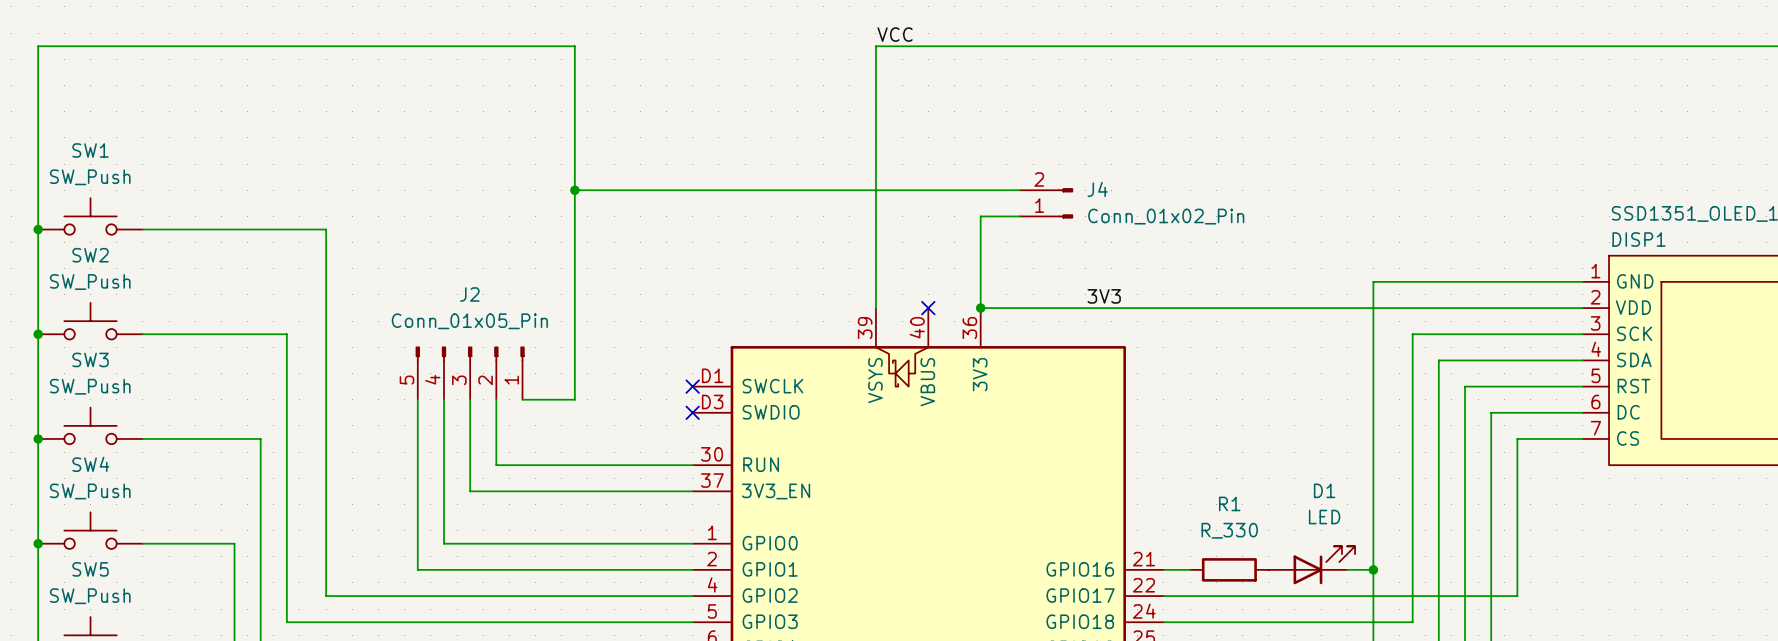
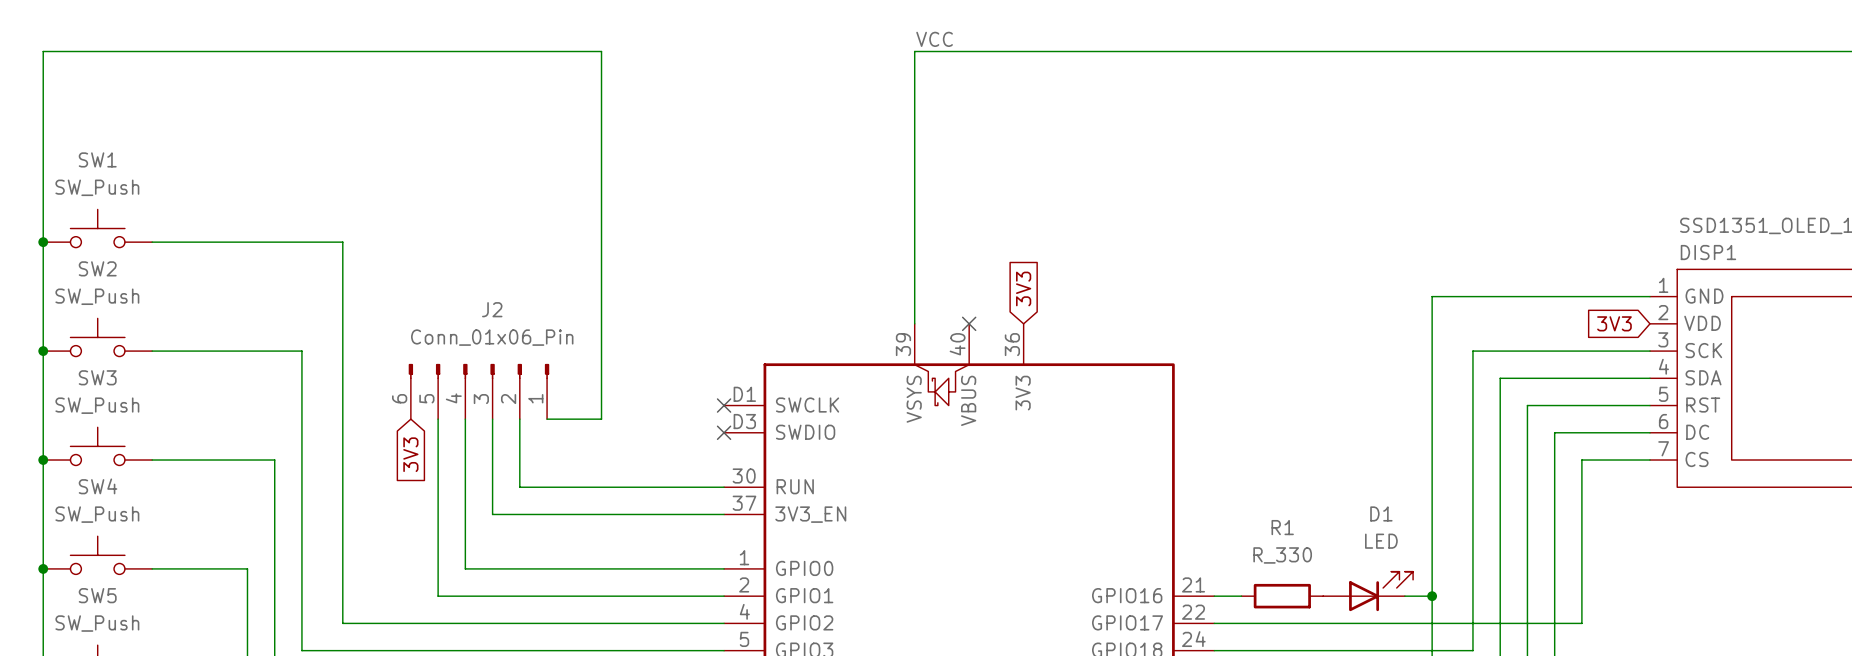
wire: (574, 190) (1019, 190) -> none
junction: (574, 190) -> none
J4: Conn_01x02_Pin (1046, 203) -> none
wire: (1019, 216) (980, 216) (980, 308) (1582, 308) -> none
global label: none -> 3V3 (1023, 288)
label: 3V3 (1104, 296) -> none
junction: (980, 308) -> none
global label: none -> 3V3 (1614, 323)
J2 value: Conn_01x05_Pin (469, 321) -> Conn_01x06_Pin (492, 337)
J2 symbol: [415, 346, 525, 400] -> [408, 363, 550, 420]
global label: none -> 3V3 (410, 454)

